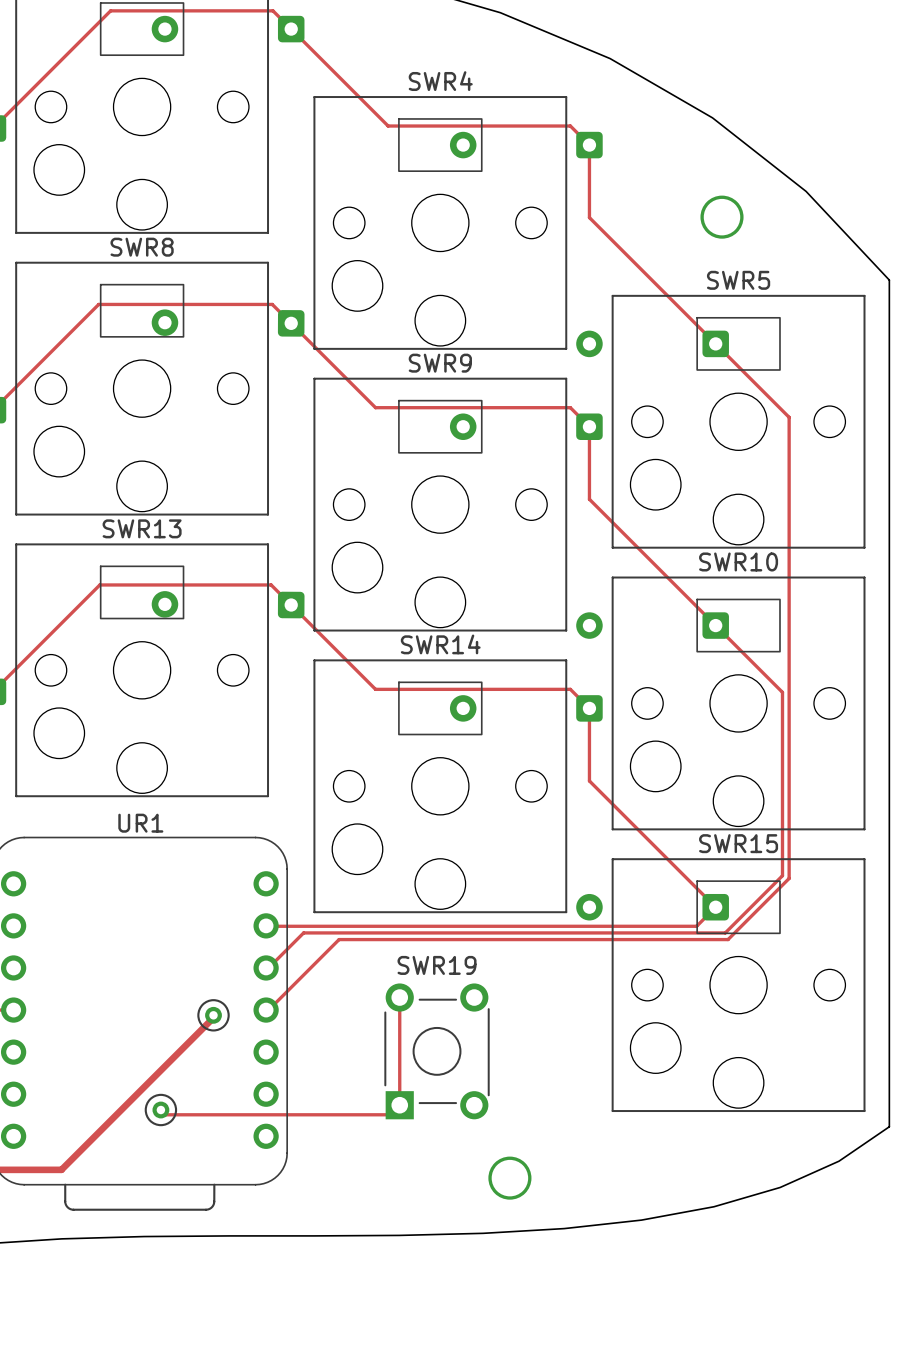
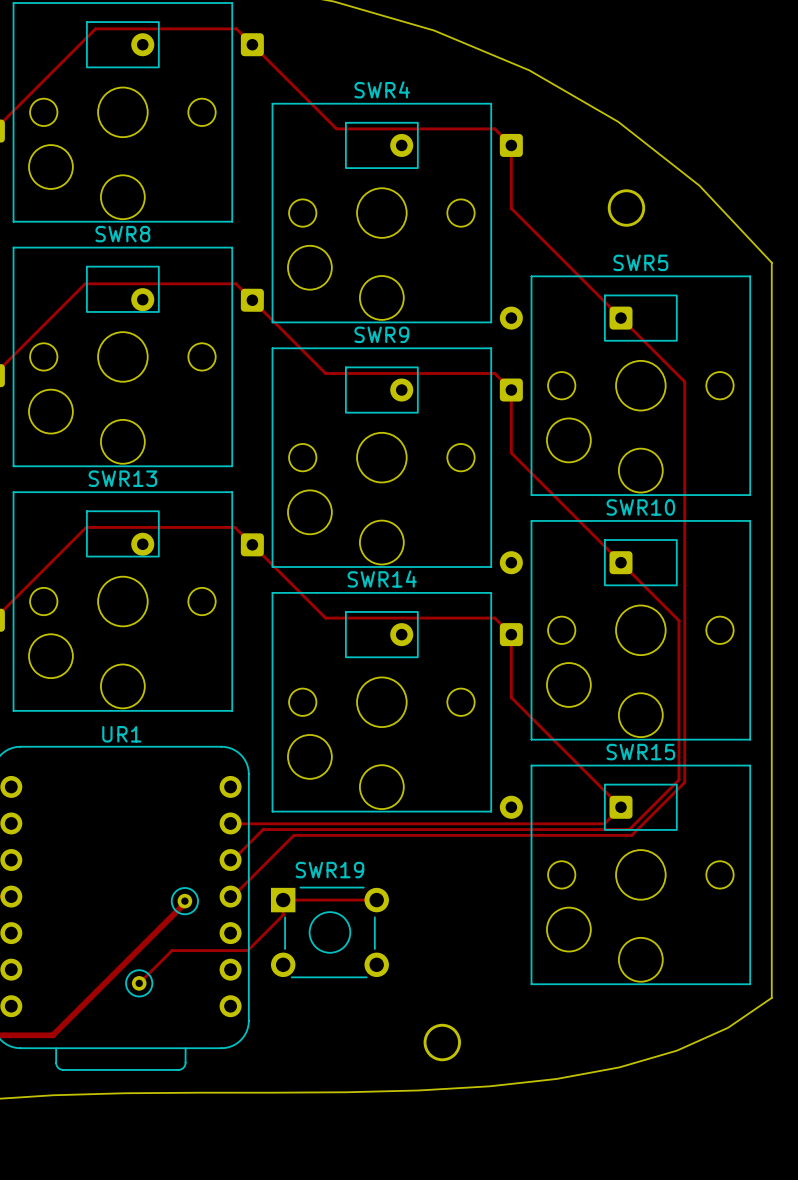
track: (399, 997) (399, 1105) (390, 1114) (165, 1114) (160, 1110) -> (376, 900) (283, 900) (283, 915) (247, 950) (171, 950) (139, 983)
SWR19 rotation: 0° (437, 1051) -> 90° clockwise (329, 932)

